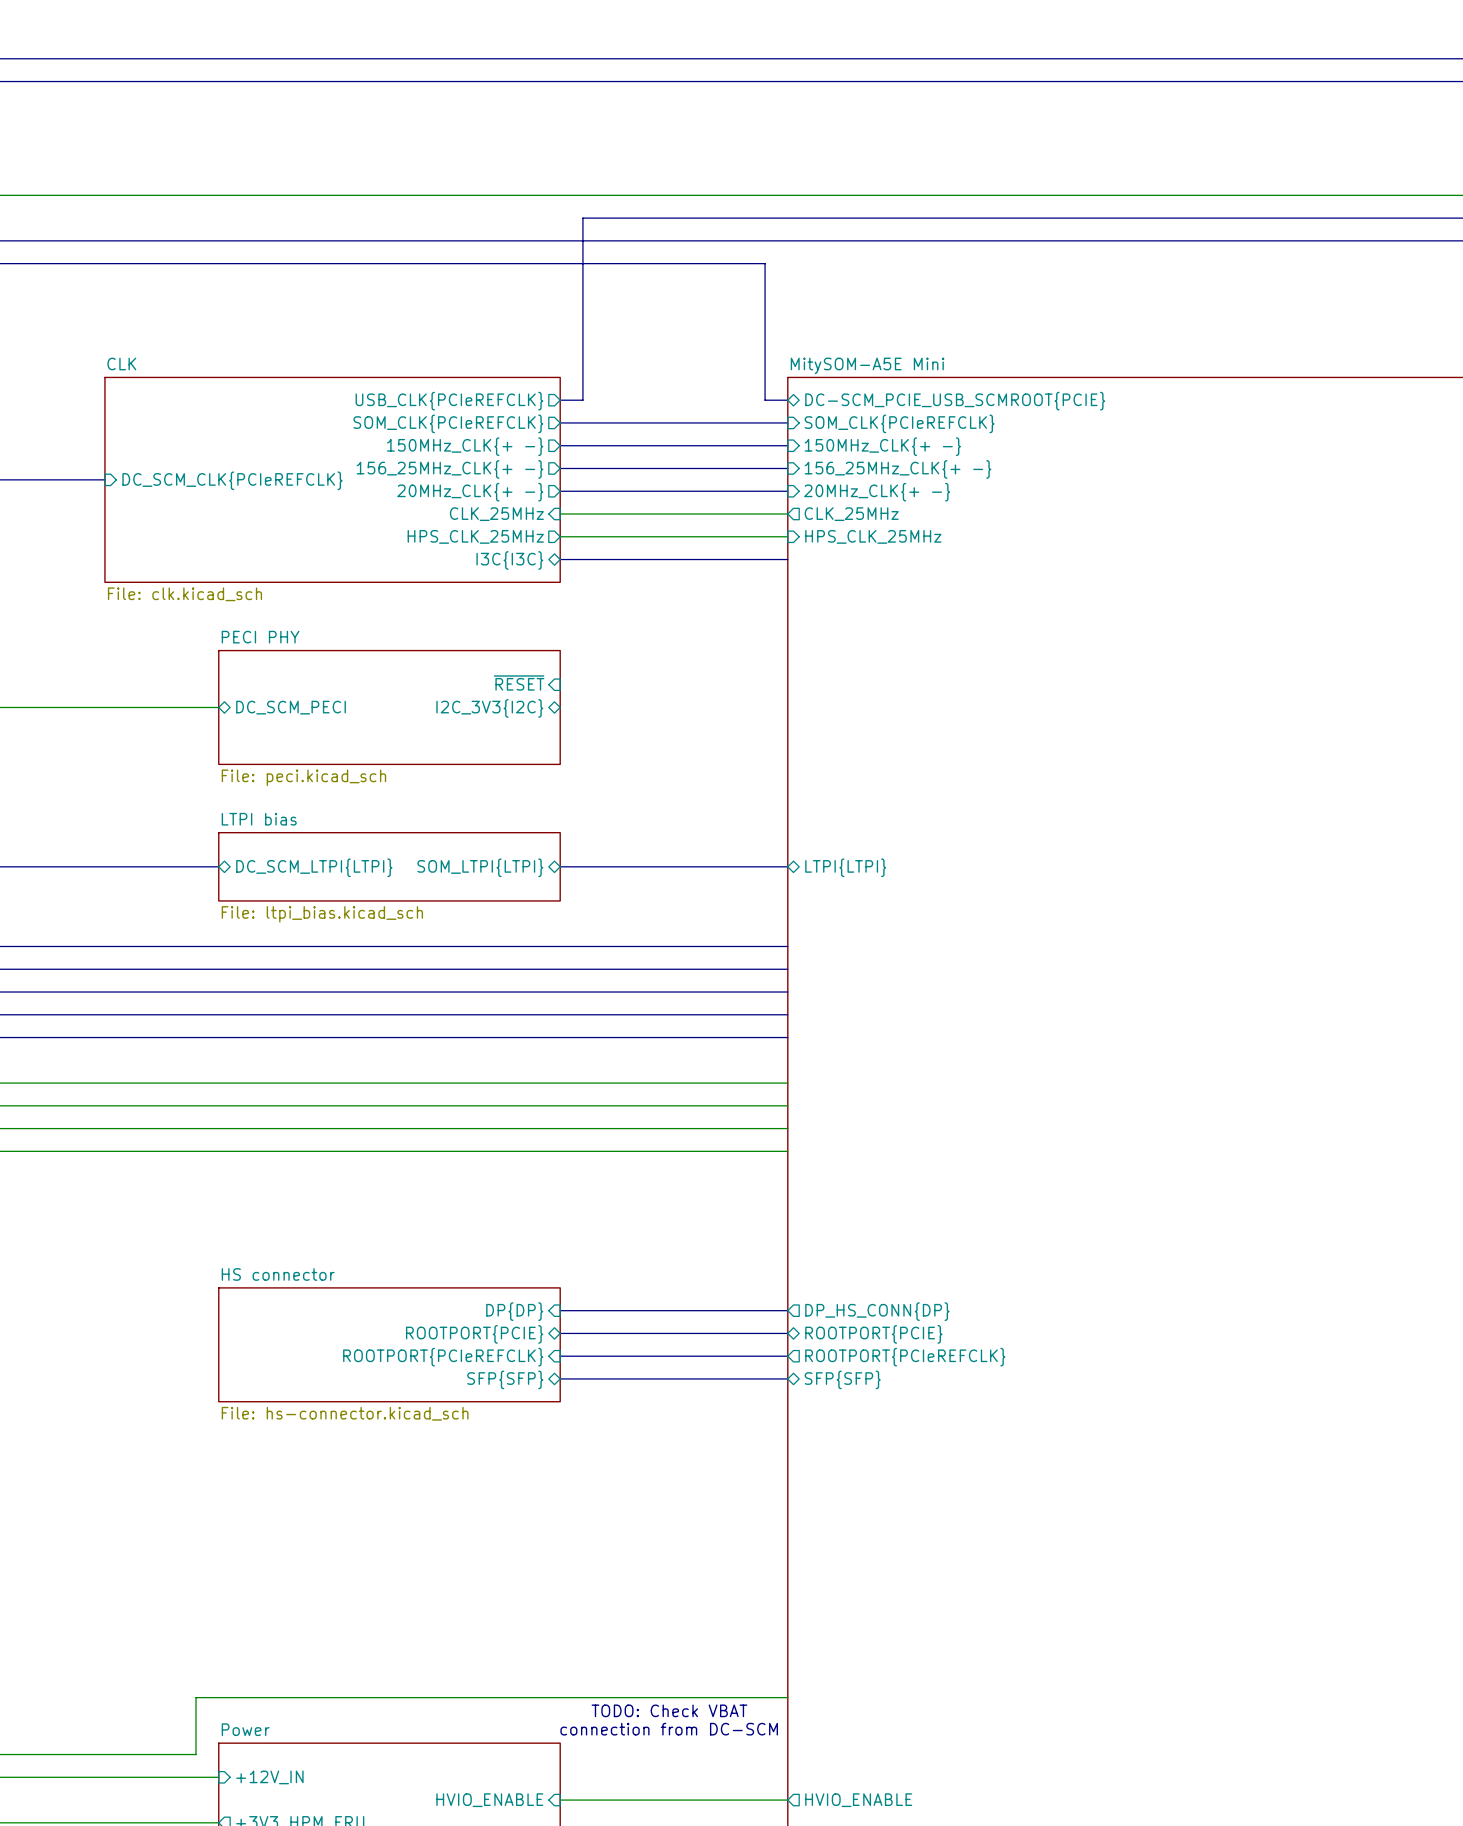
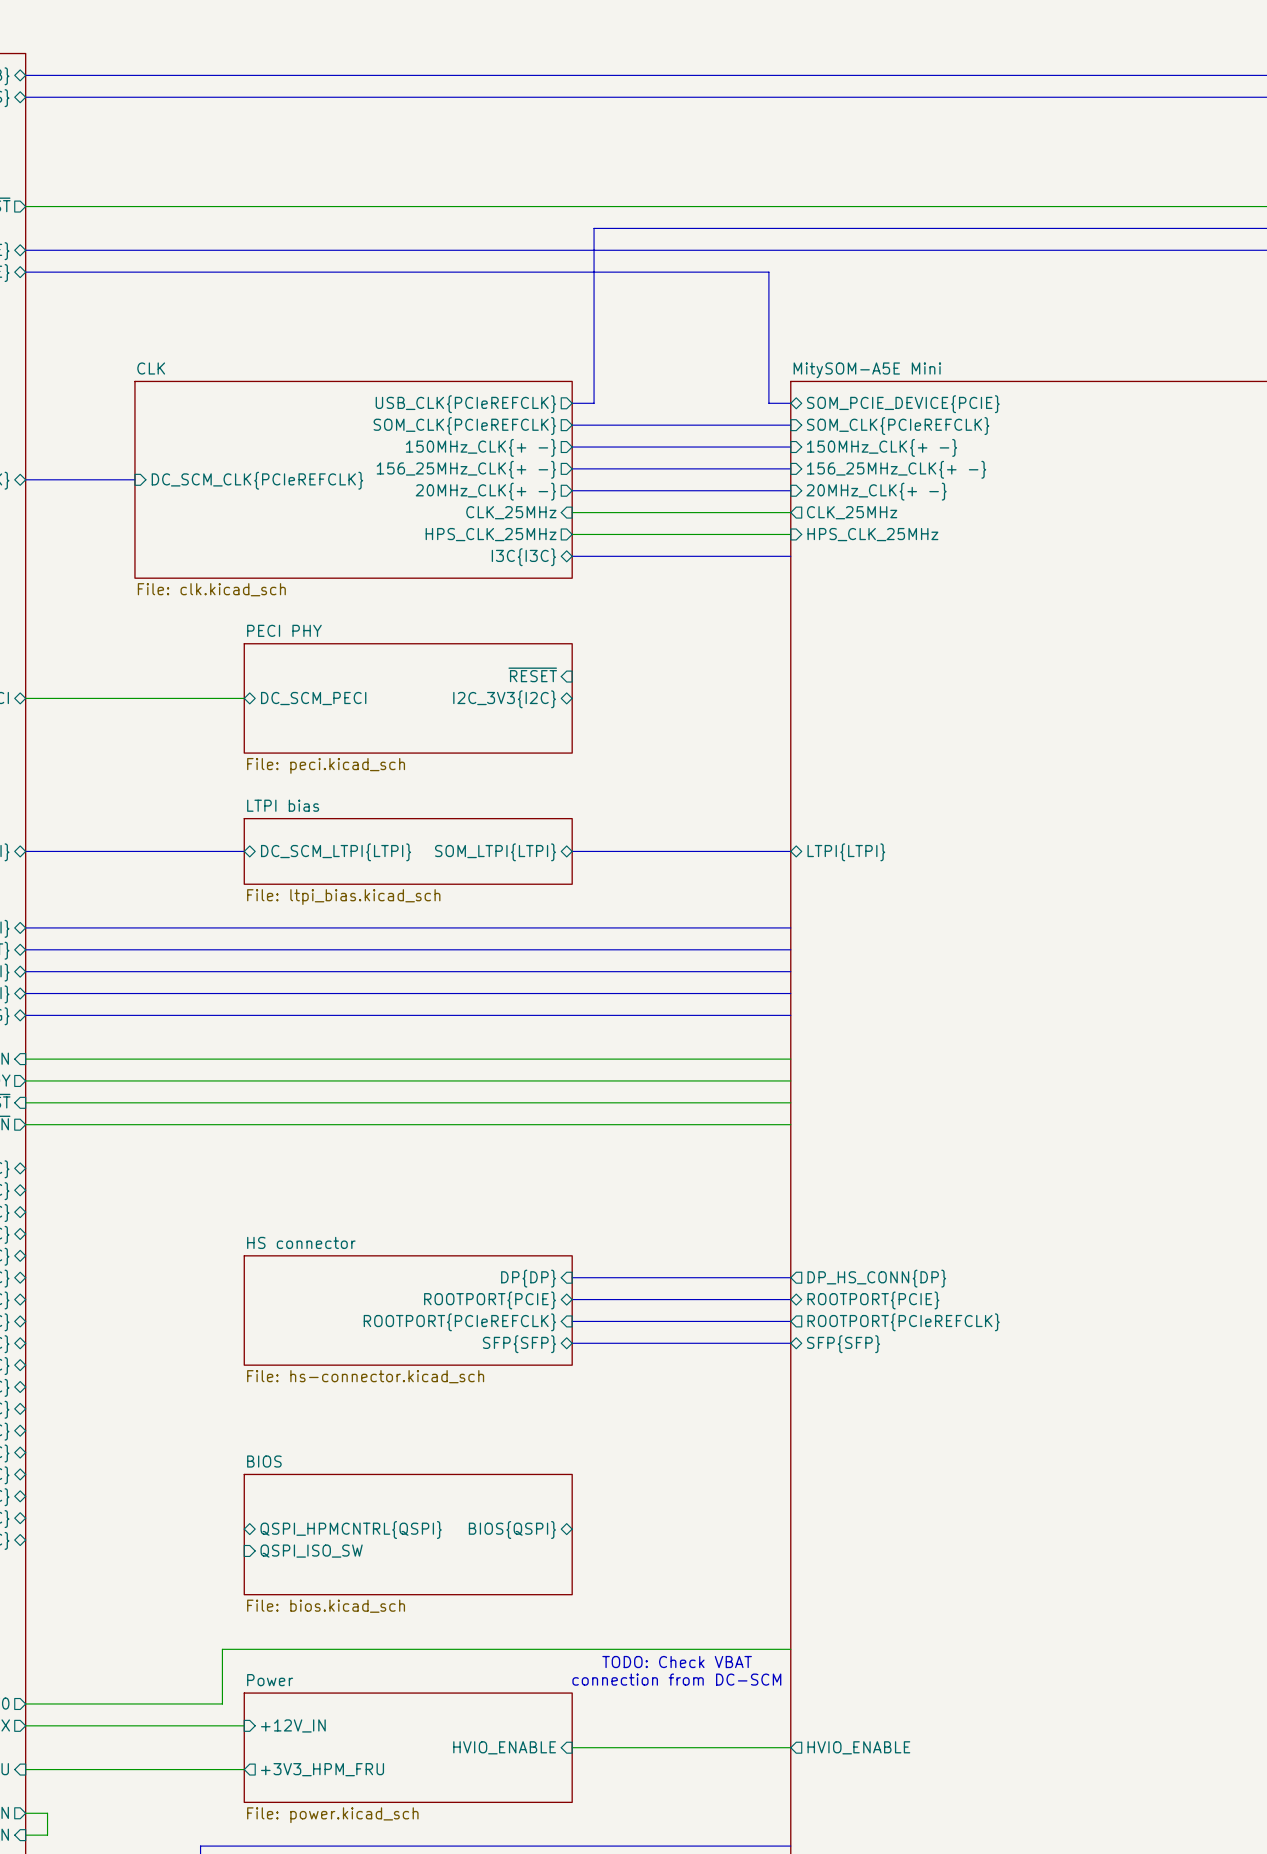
sheet pin: DC-SCM_PCIE_USB_SCMROOT{PCIE} (955, 401) -> SOM_PCIE_DEVICE{PCIE} (903, 404)
sheet pin: none -> QSPI_HPMCNTRL{QSPI} (351, 1529)
sheet pin: none -> BIOS{QSPI} (512, 1529)
sheet BIOS: none -> File: bios.kicad_sch (408, 1534)
sheet pin: none -> QSPI_ISO_SW (311, 1551)

